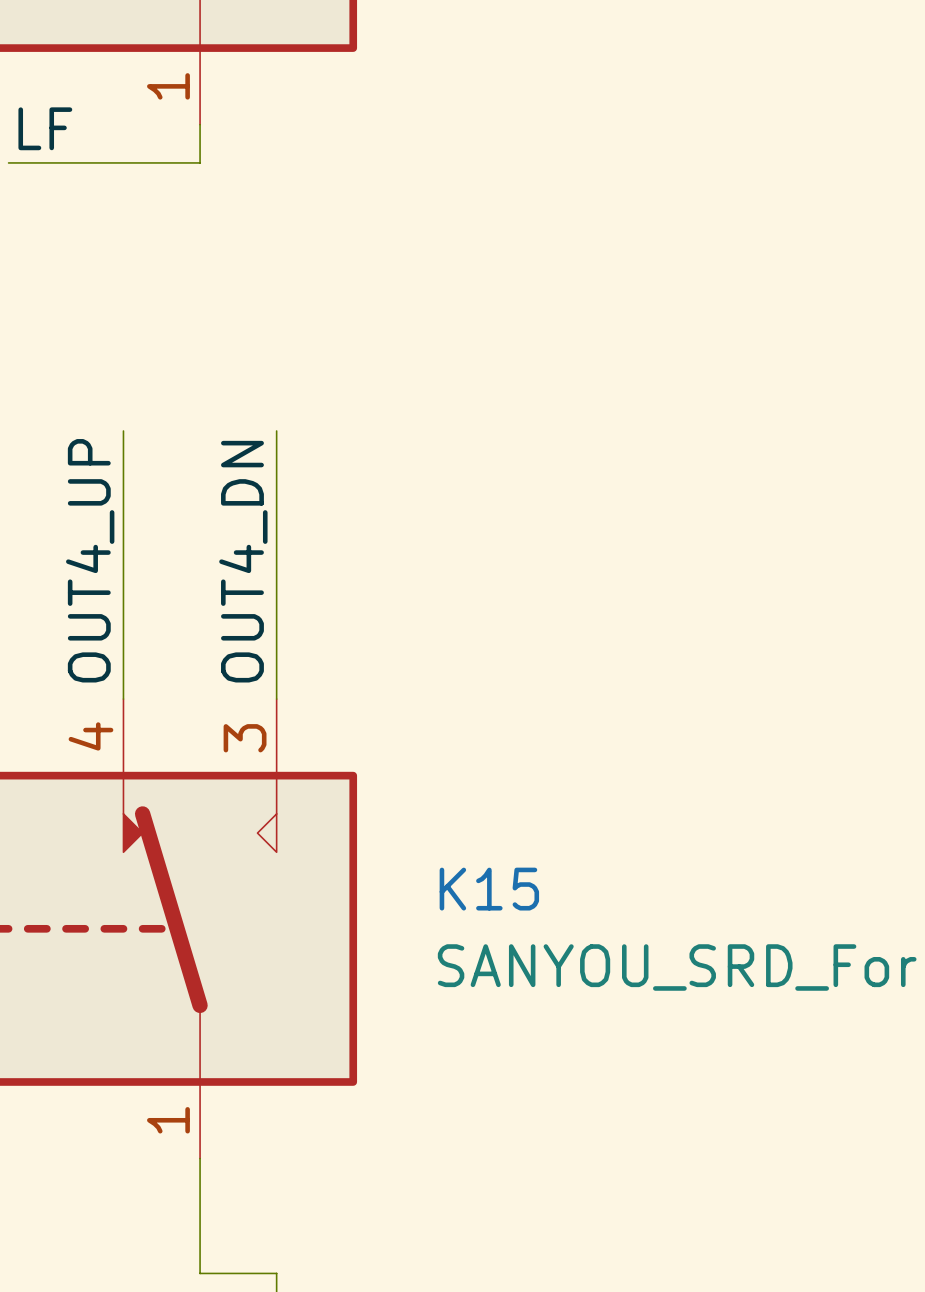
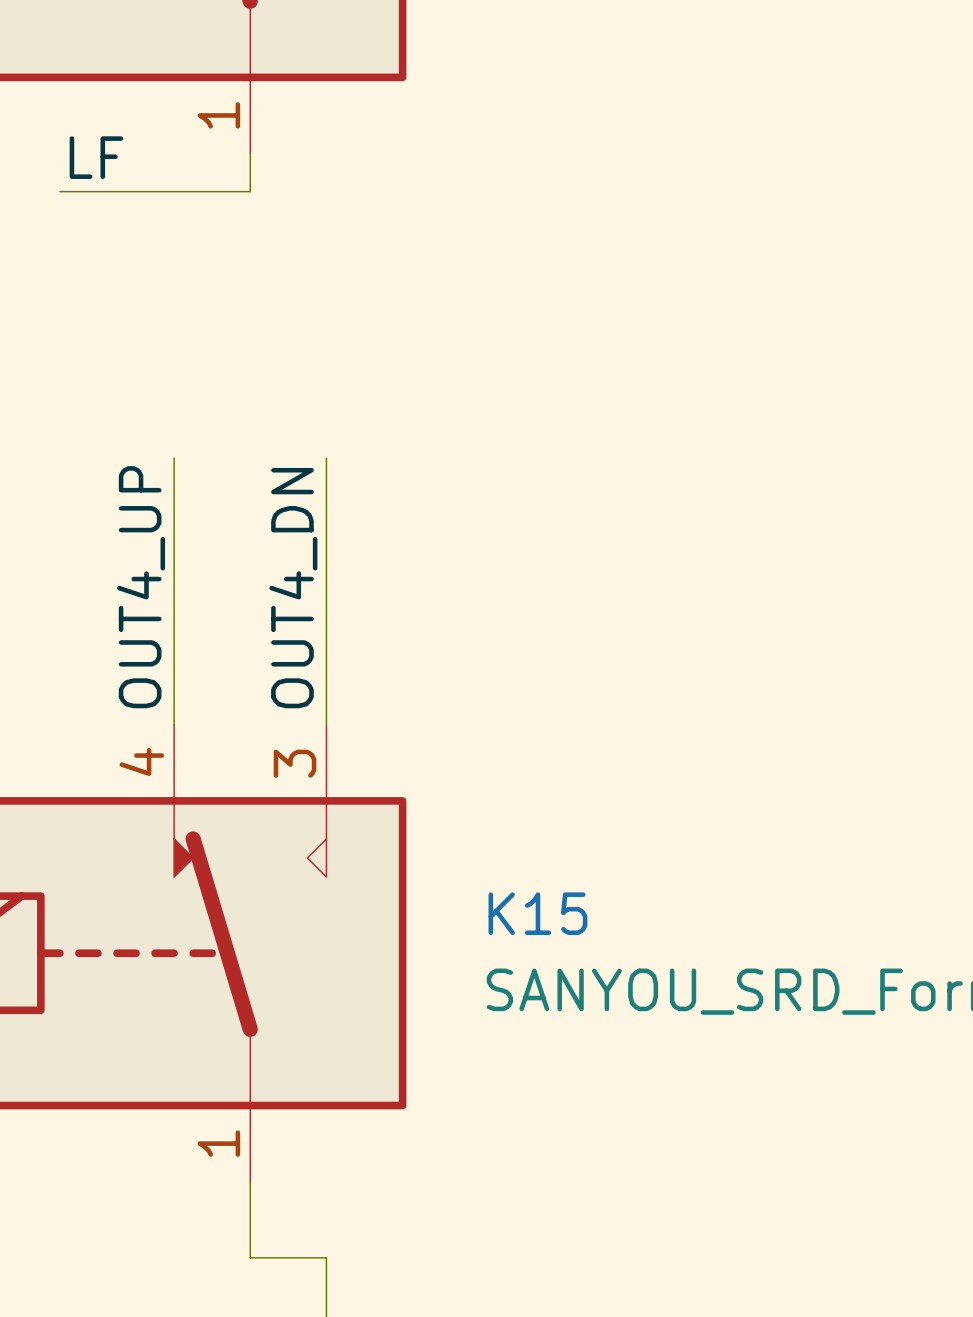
wire: (200, 1235) (200, 1273) (276, 1273) -> (250, 1257) (326, 1257) (326, 1295)

